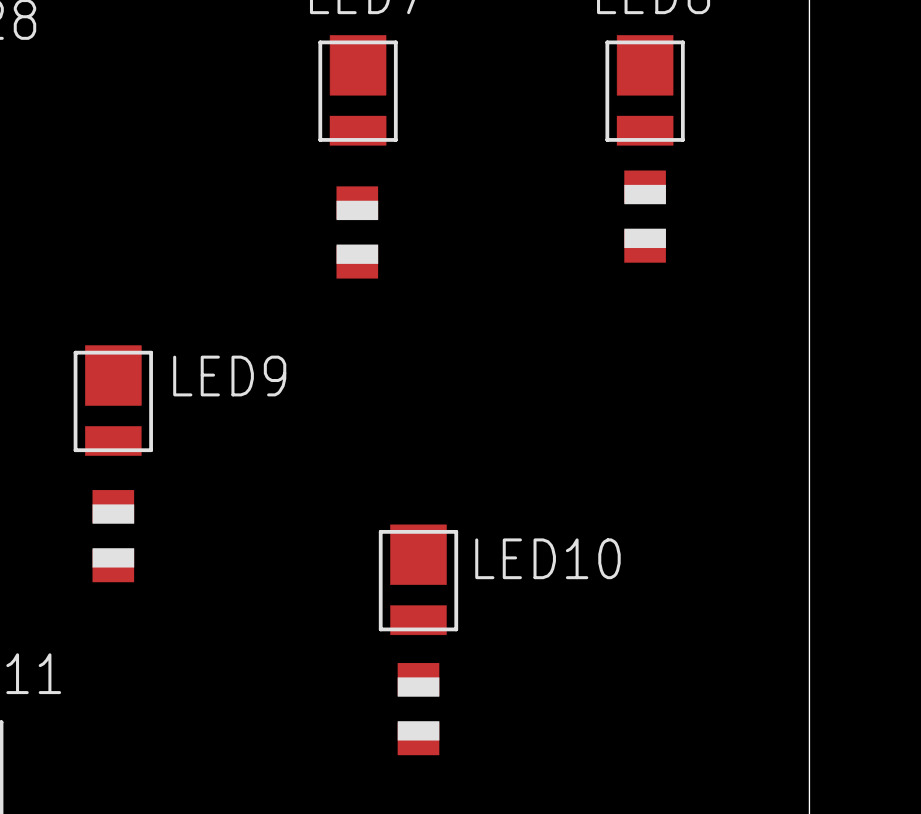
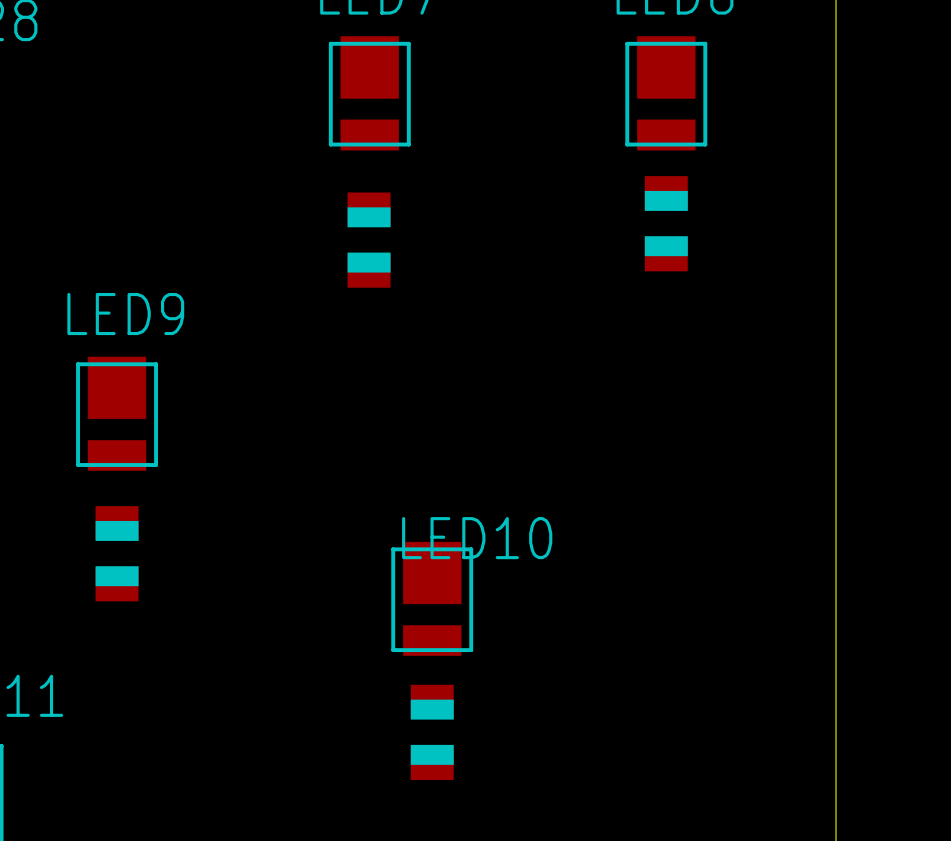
LED9 name position: LED9 (229, 376) -> LED9 (125, 314)
LED10 name position: LED10 (547, 558) -> LED10 (477, 538)

